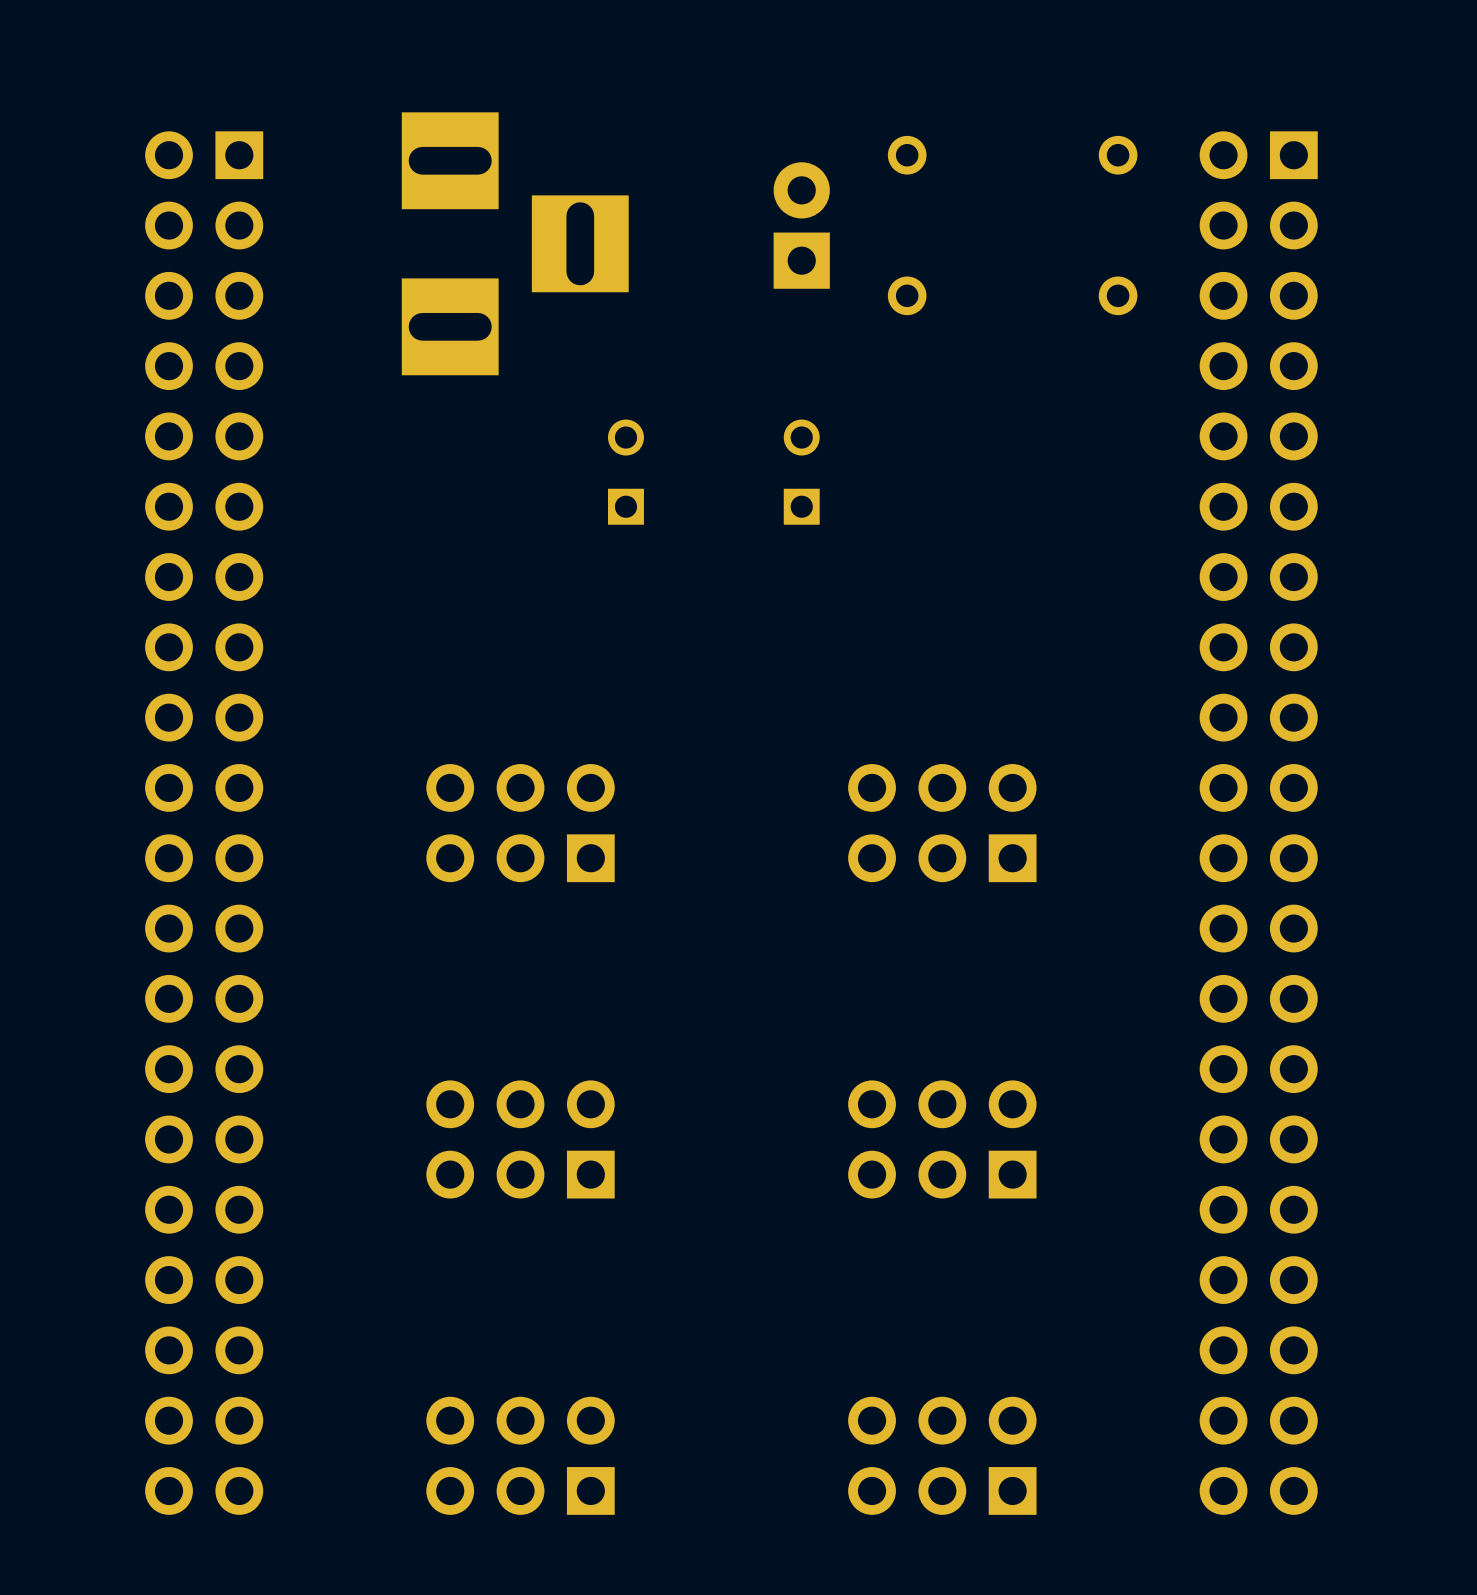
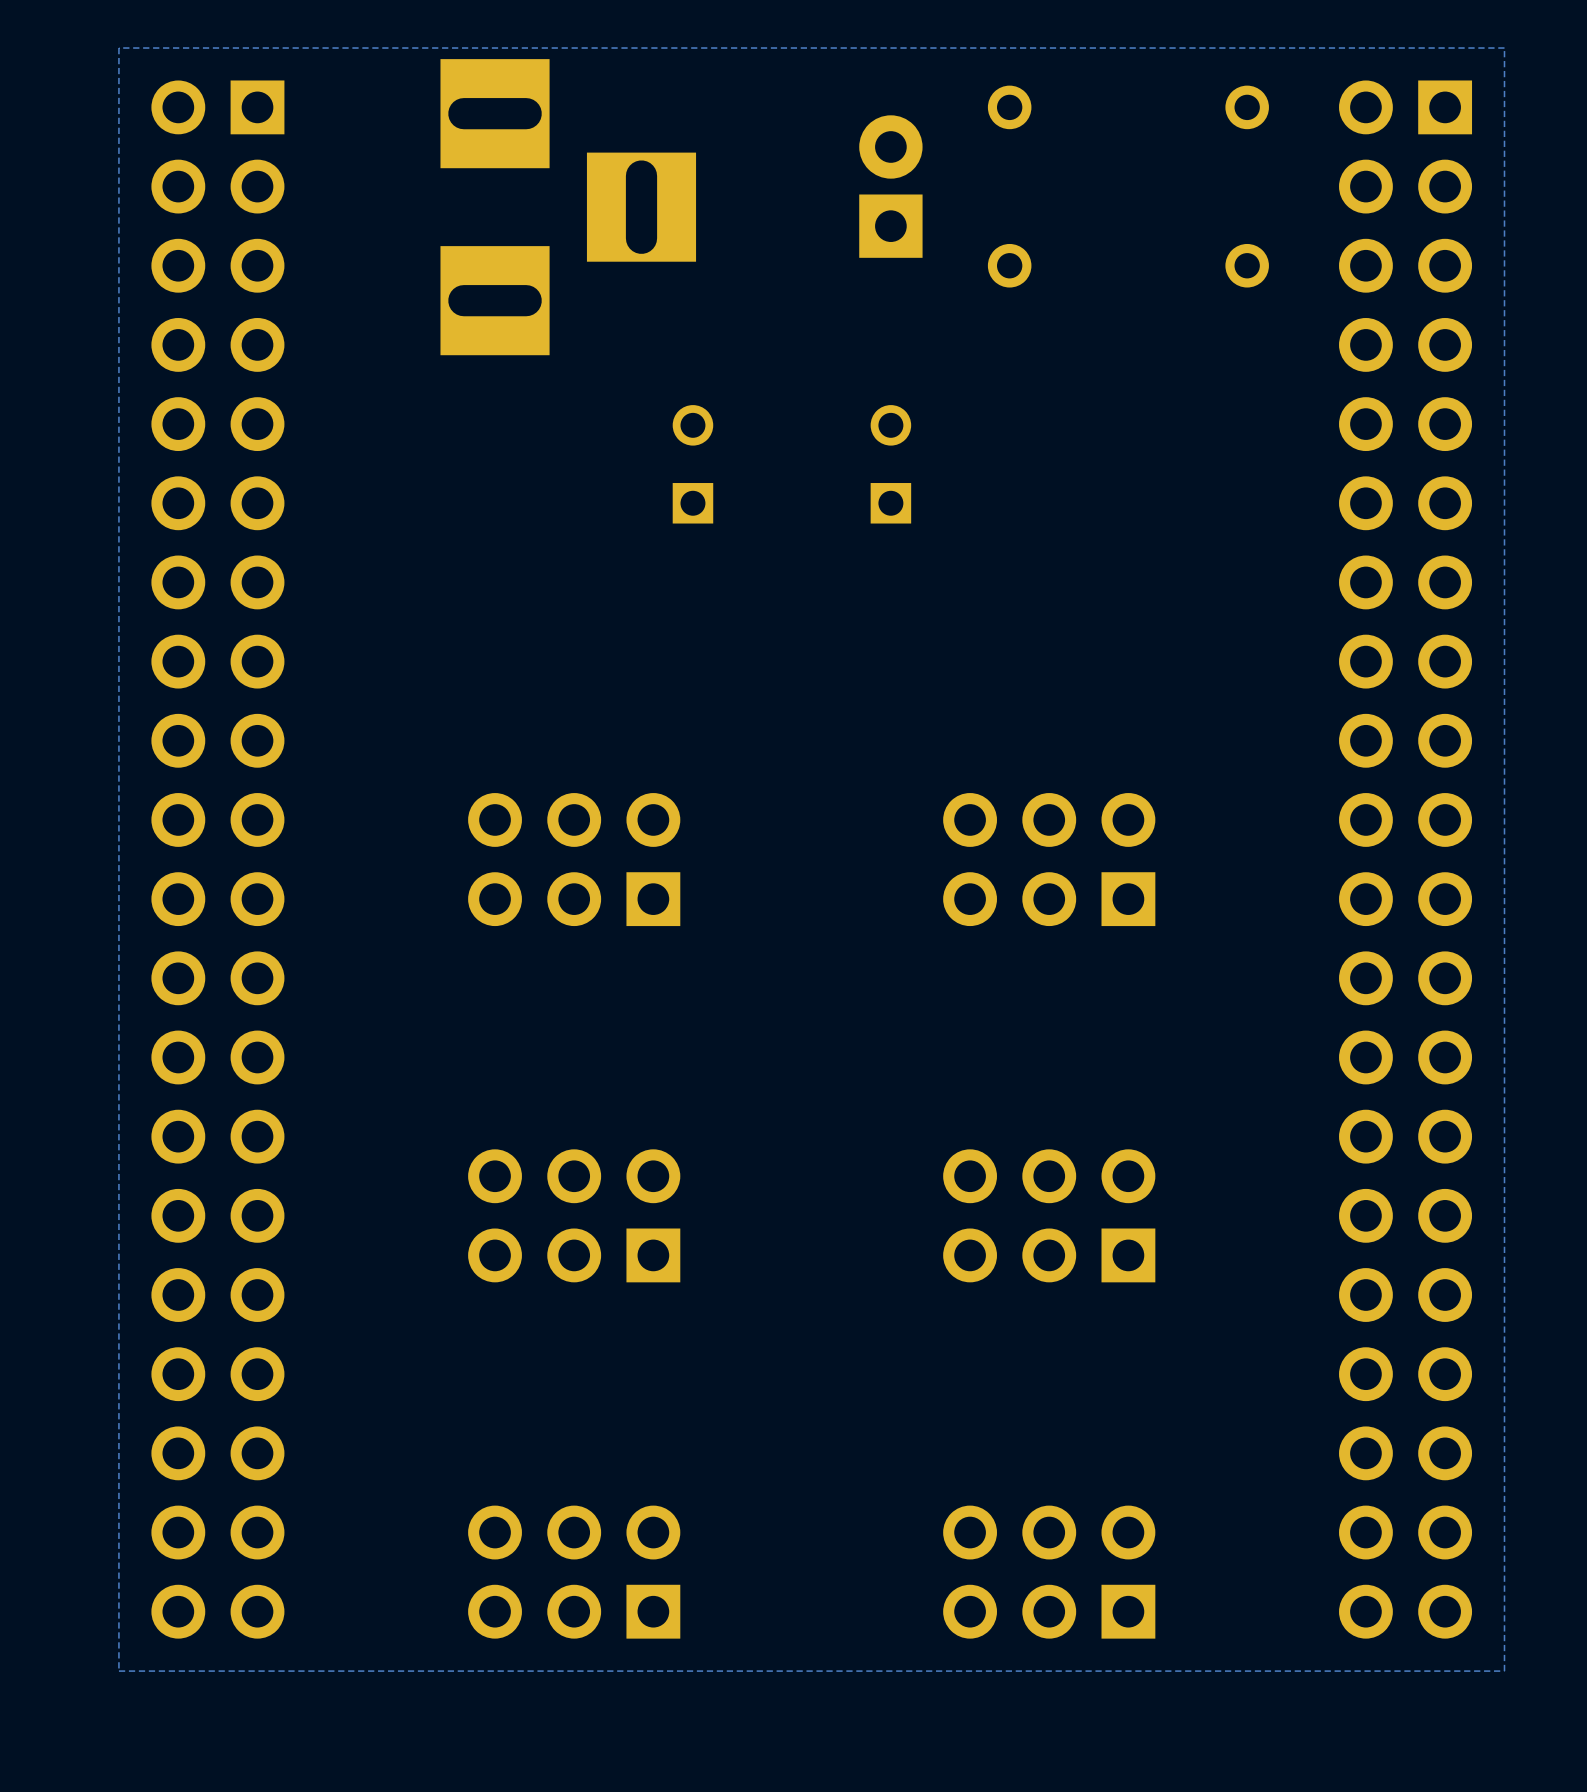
zone outline: none -> (1504, 48) (118, 48) (118, 1671) (1504, 1671) (1504, 48)

